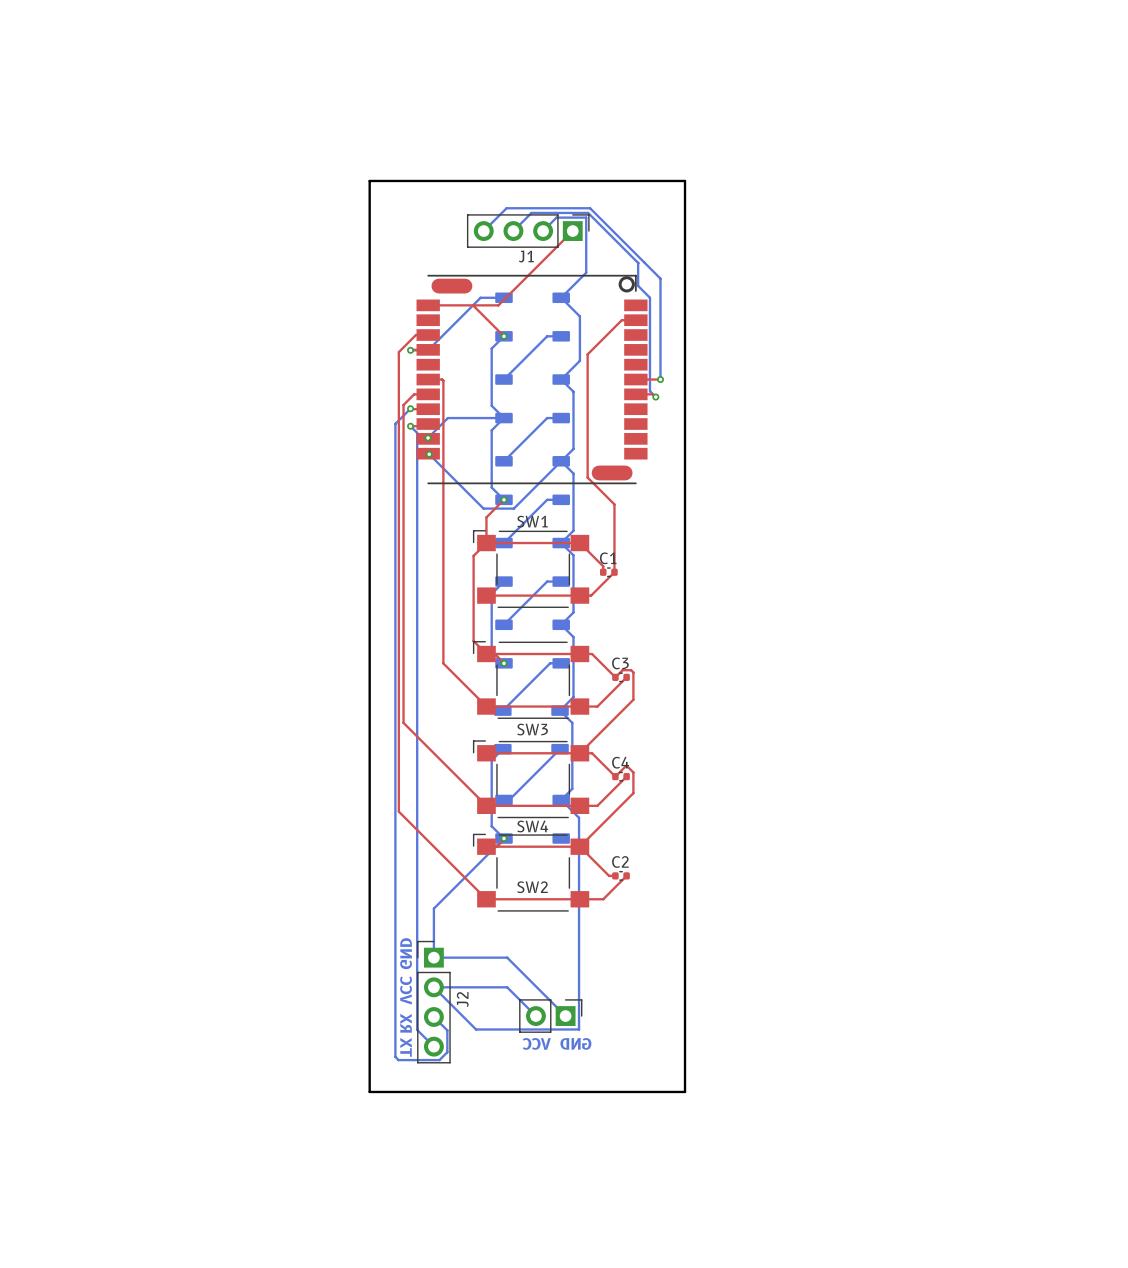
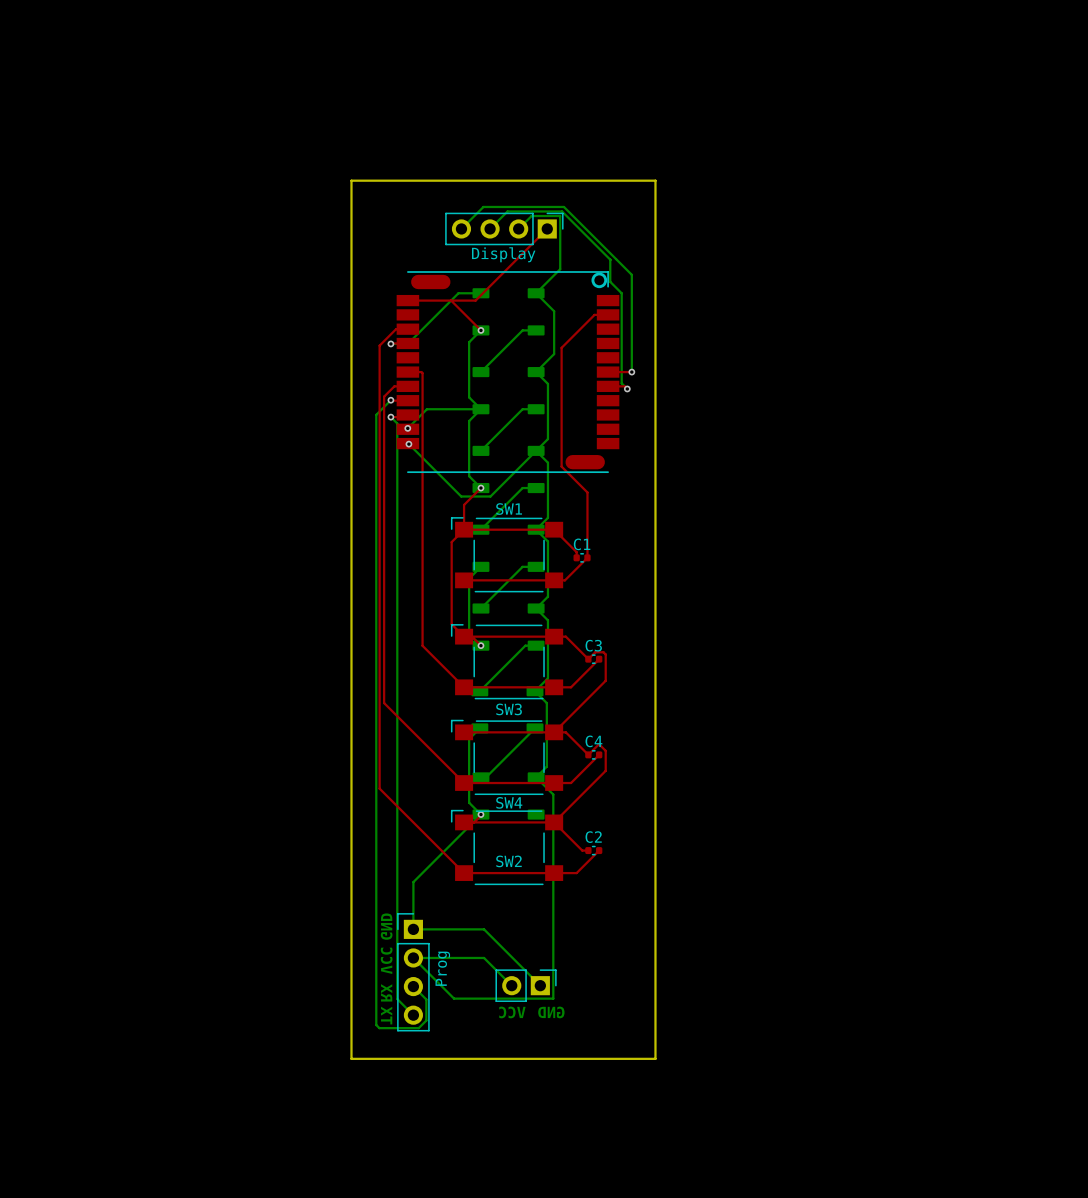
J1 name: J1 (526, 256) -> Display (503, 254)
J2 name: J2 (462, 999) -> Prog (442, 968)

